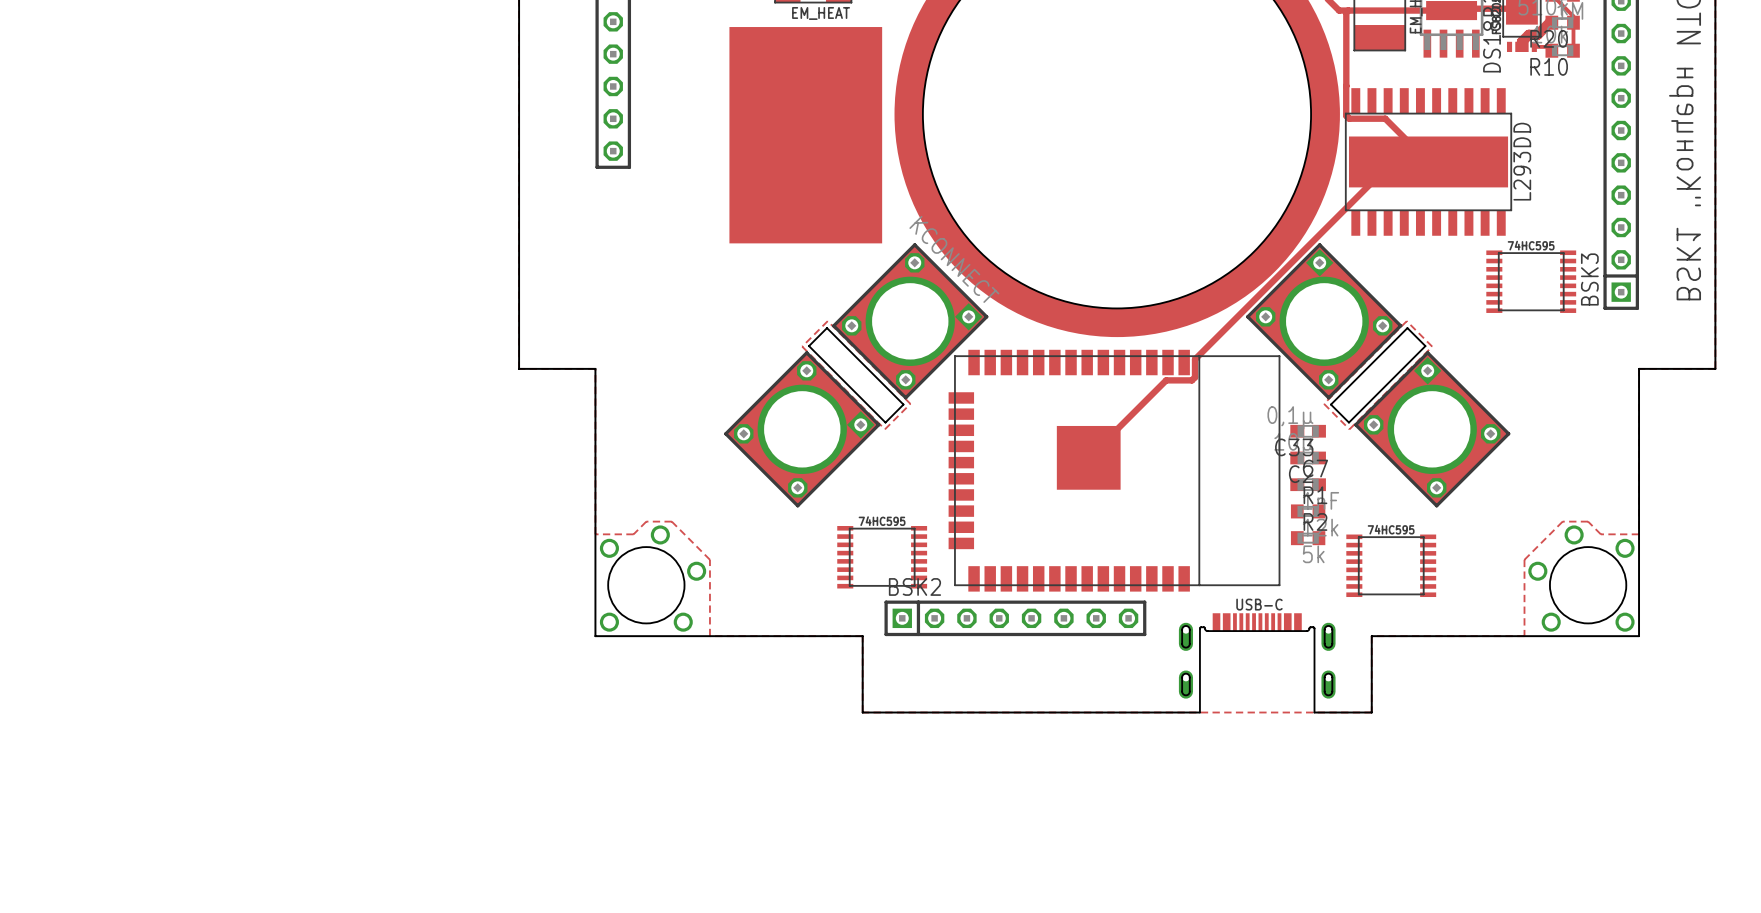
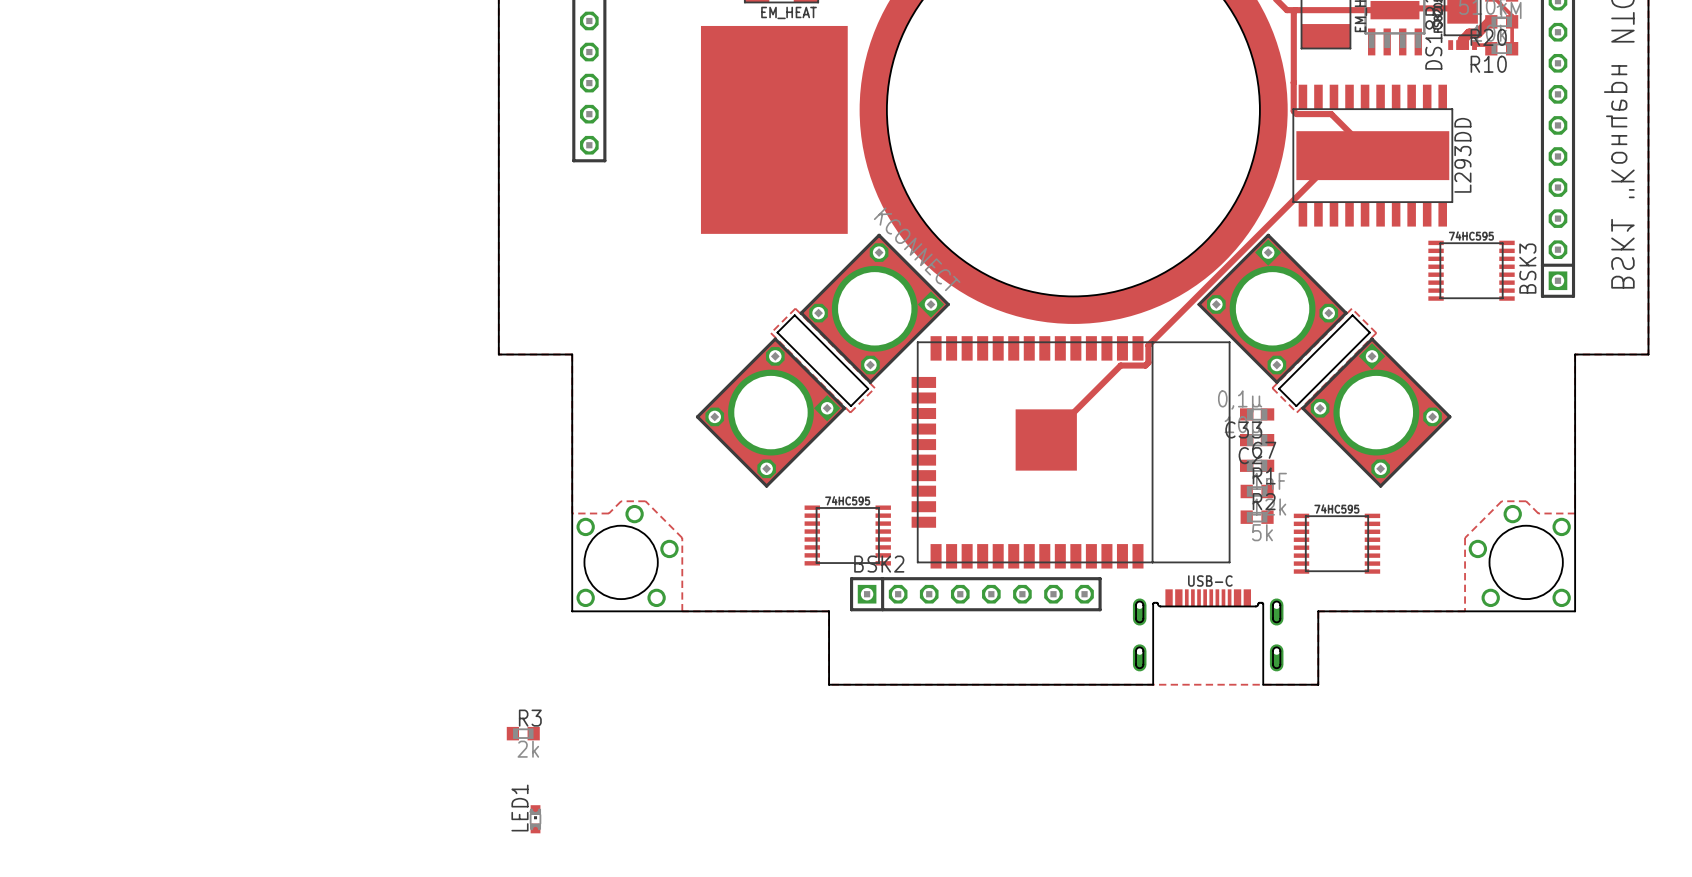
R3: none -> 2k (523, 733)
LED1: none -> (535, 819)

